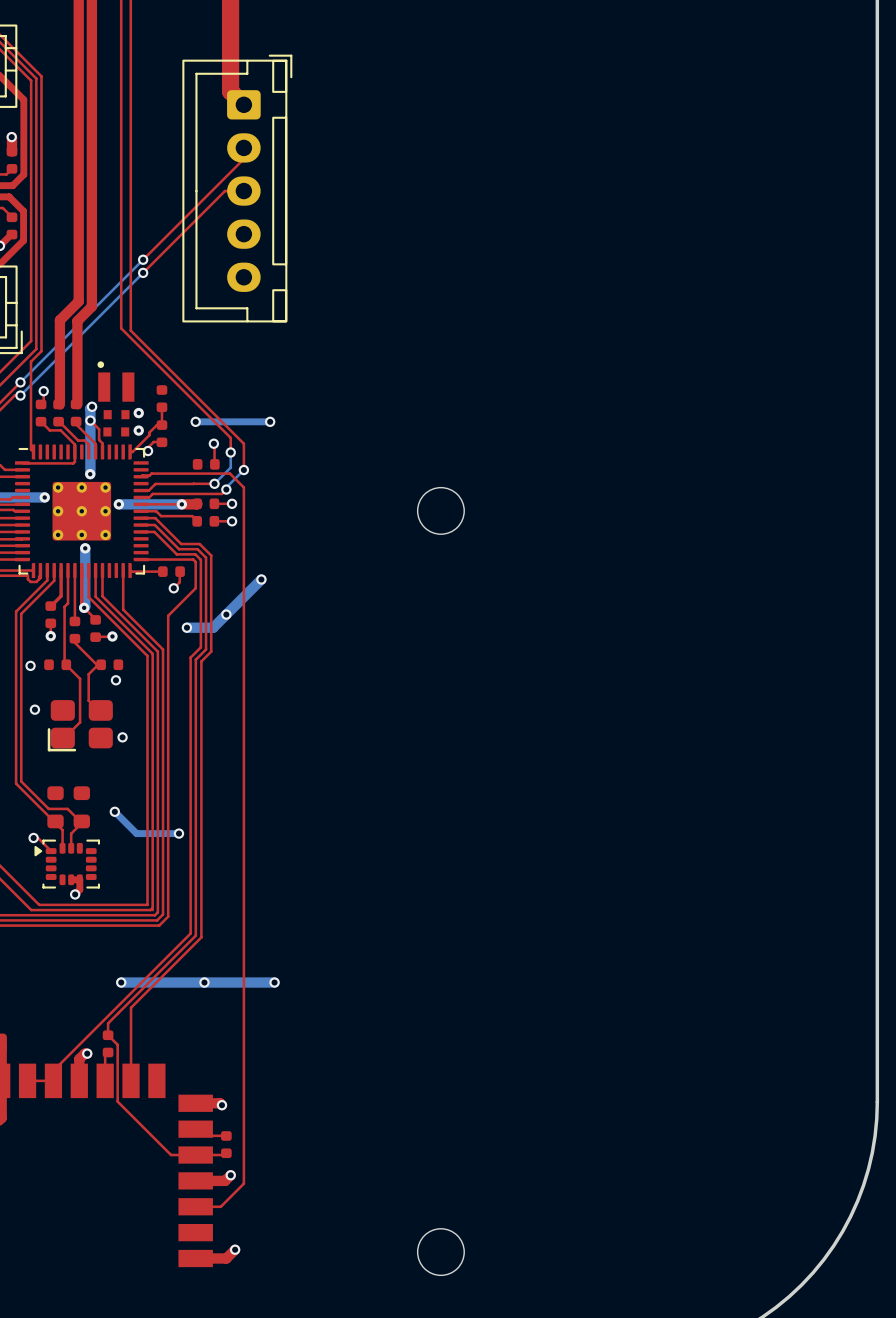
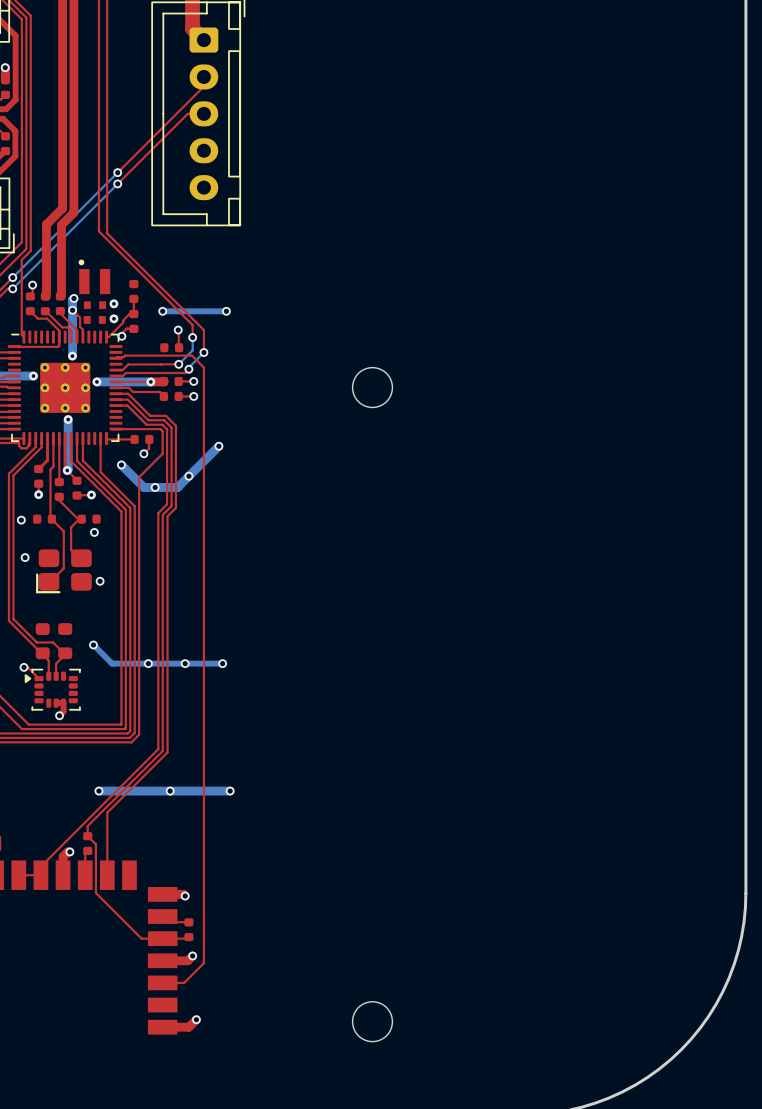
bottom track: none -> (121, 464) (143, 487) (155, 487)
via: none -> (121, 464)
bottom track: none -> (148, 663) (222, 663)
via: none -> (185, 663)
via: none -> (222, 663)

